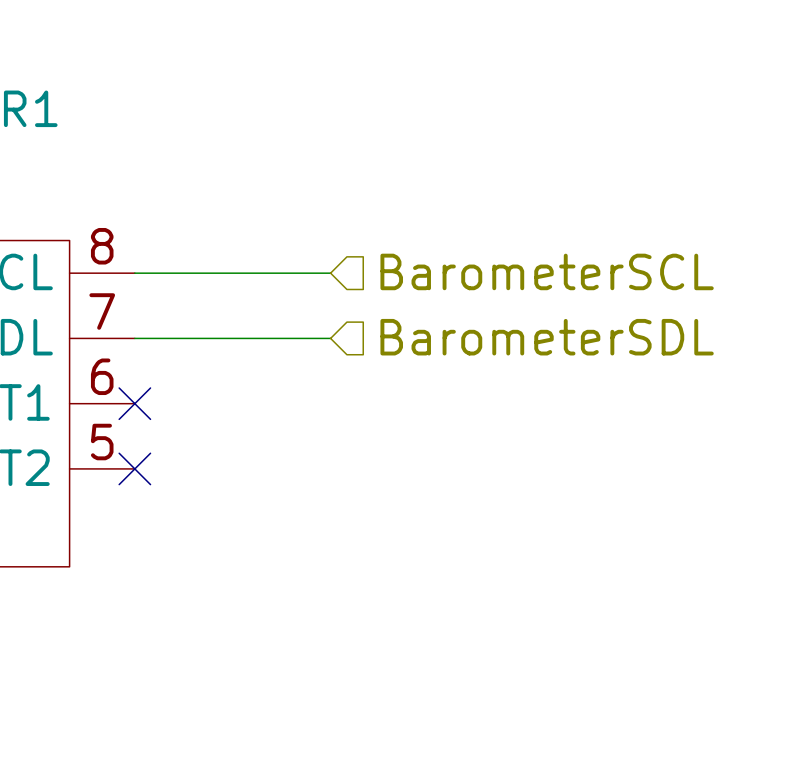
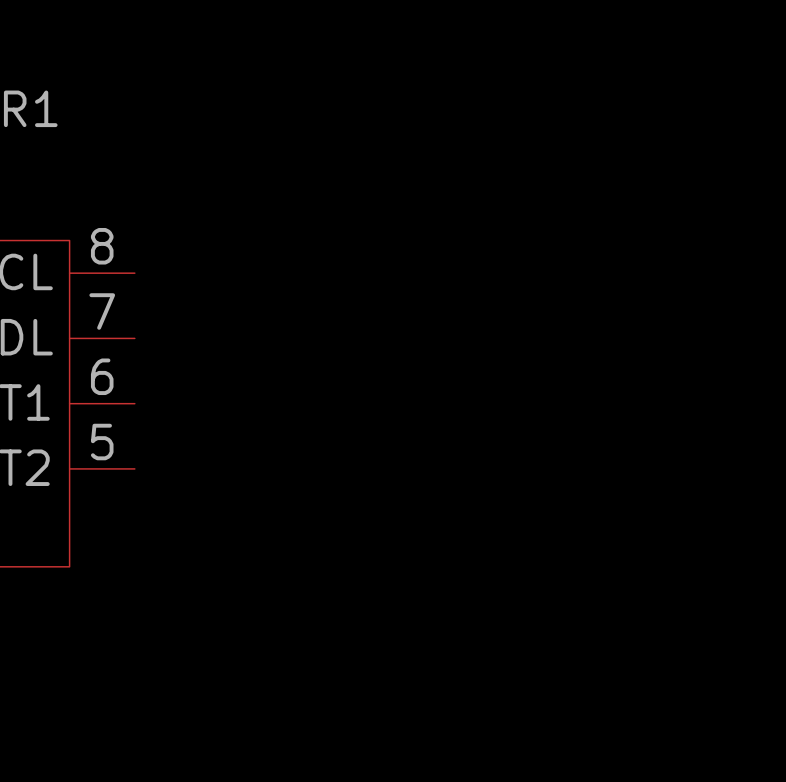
hierarchical label: BarometerSCL (547, 271) -> none
wire: (134, 273) (330, 273) -> none
hierarchical label: BarometerSDL (547, 337) -> none
wire: (134, 338) (330, 338) -> none
no-connect mark: (134, 403) -> none
no-connect mark: (134, 468) -> none

